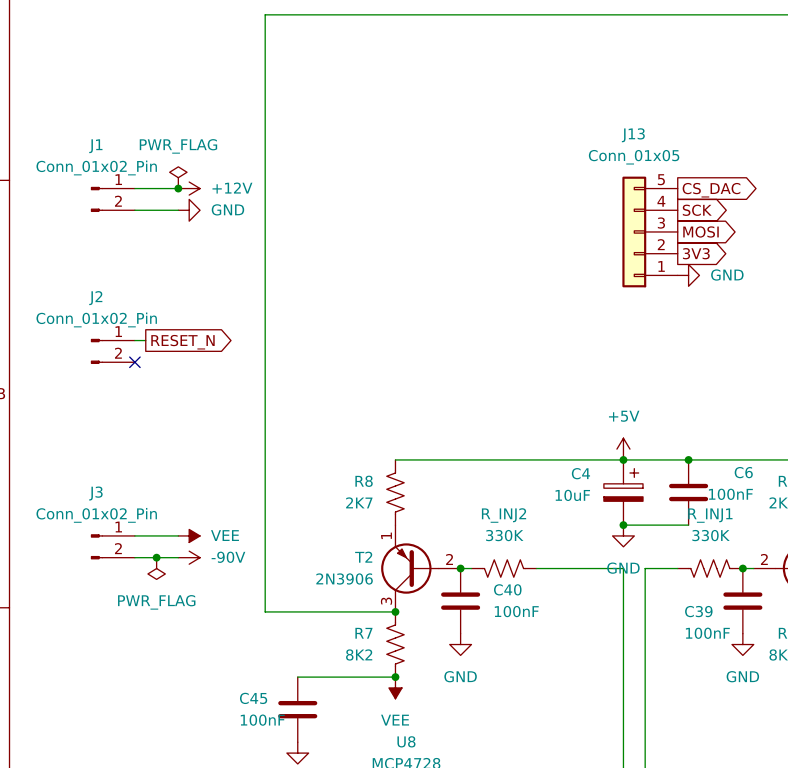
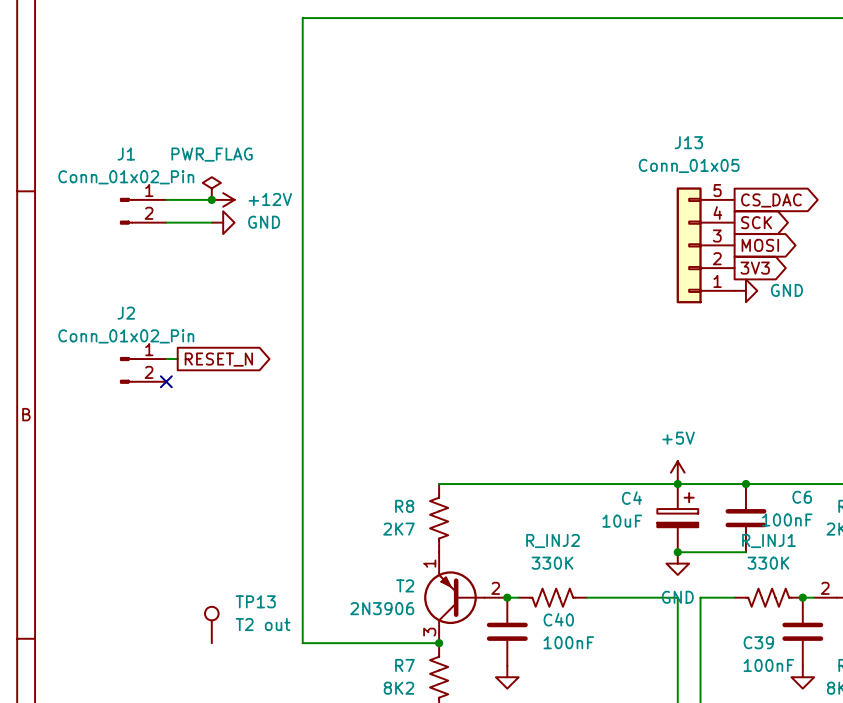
wire: (134, 535) (178, 535) -> none
power symbol: VEE (189, 535) -> none
J3: Conn_01x02_Pin (112, 546) -> none
wire: (134, 557) (178, 557) -> none
junction: (156, 557) -> none
power symbol: -90V (189, 557) -> none
power symbol: PWR_FLAG (156, 568) -> none
TP13: none -> T2 out (211, 624)

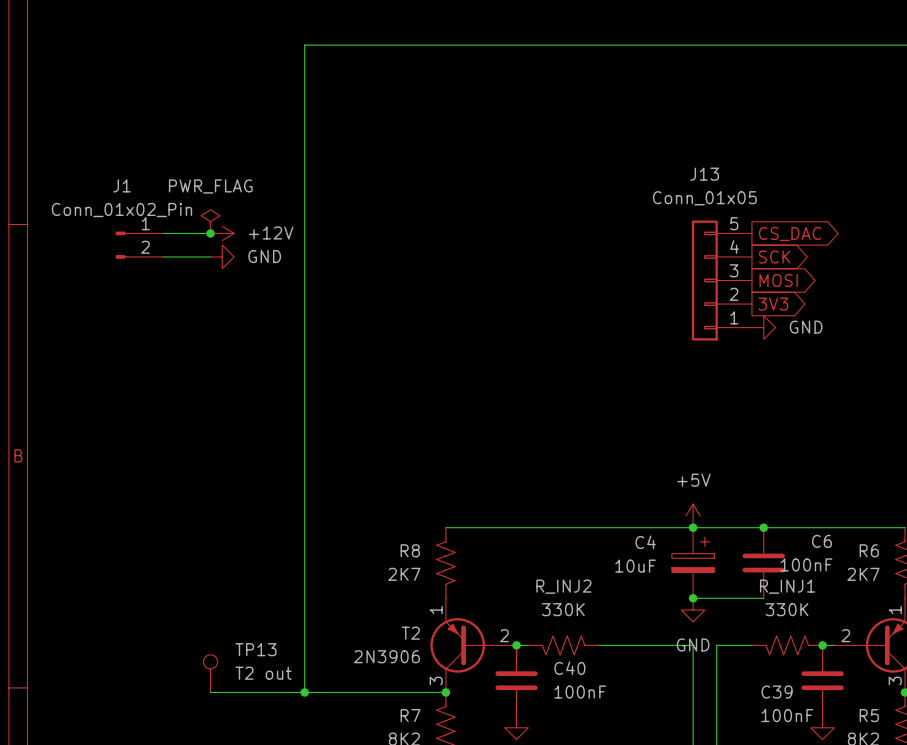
wire: (166, 359) (177, 359) -> none
global label: RESET_N (218, 359) -> none
J2: Conn_01x02_Pin (143, 370) -> none
no-connect mark: (166, 381) -> none
wire: none -> (210, 692) (304, 692)
junction: none -> (304, 692)

